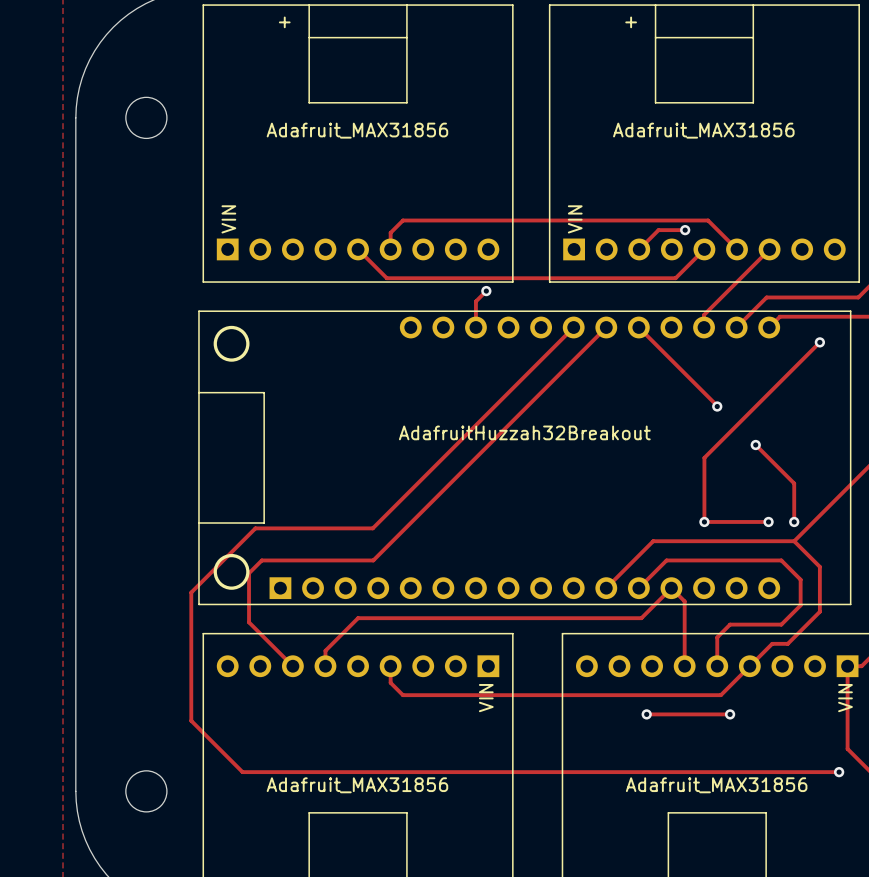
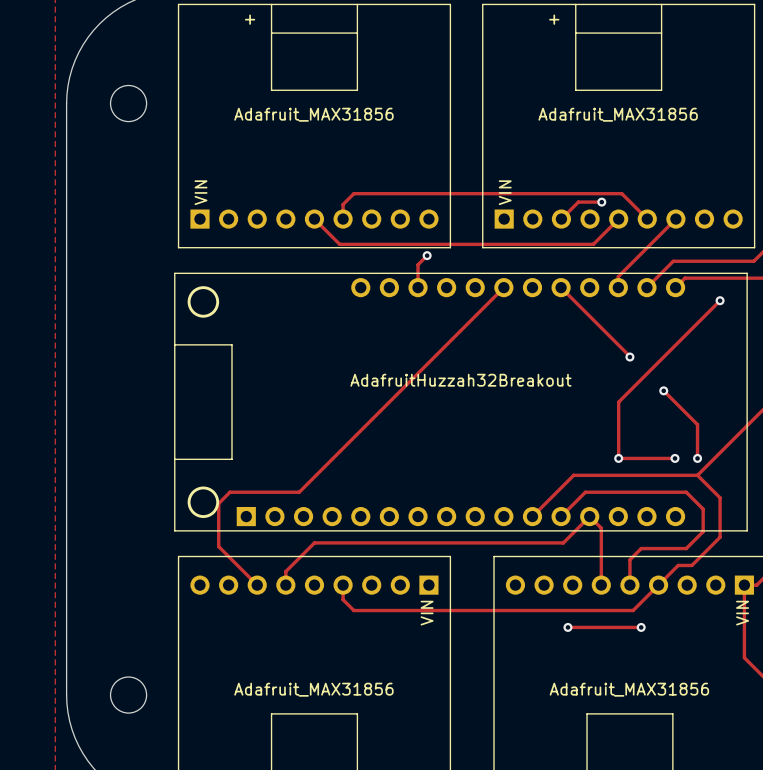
track: (606, 327) (373, 560) (340, 560) -> (327, 464) (299, 492)
track: (372, 528) (255, 528) (191, 592) (191, 720) (242, 772) (839, 772) -> none
via: (839, 772) -> none

